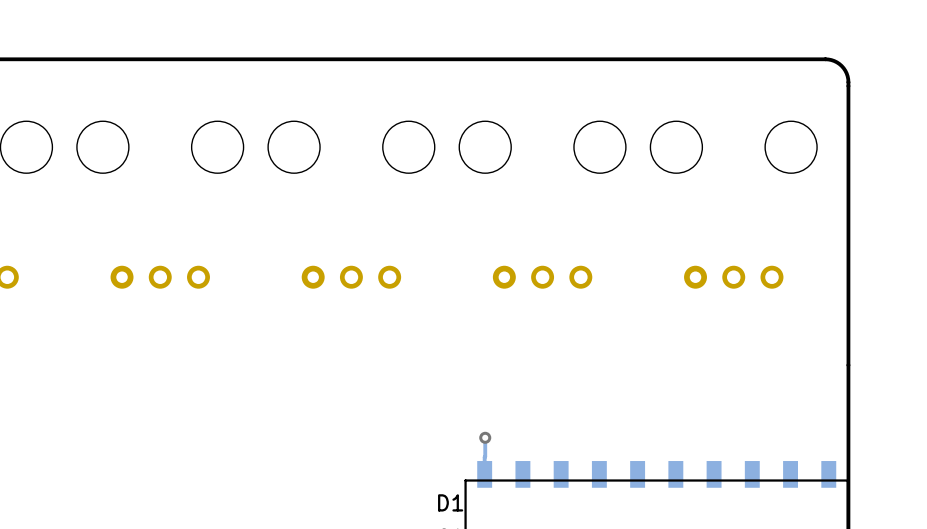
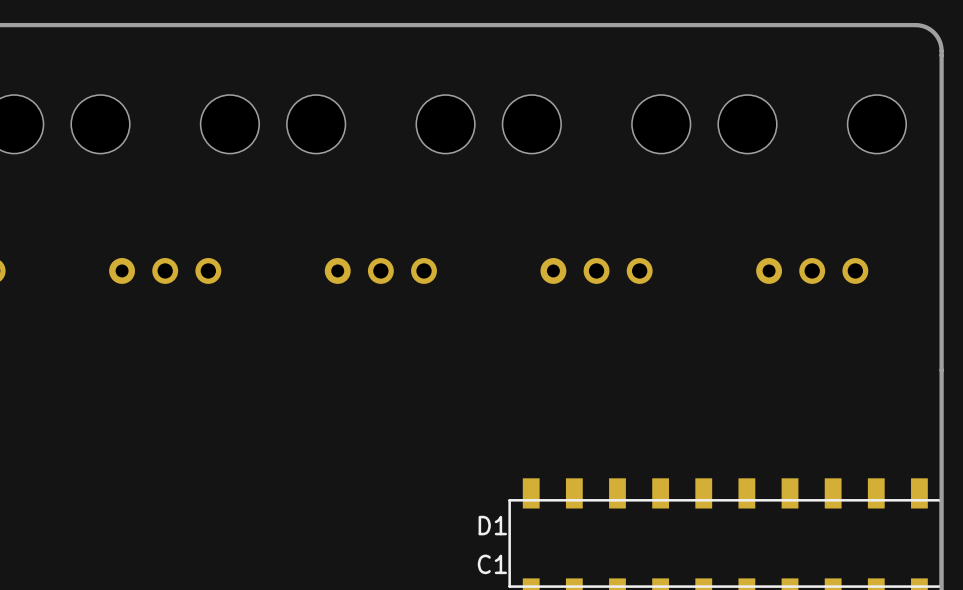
track: (485, 437) (484, 474) -> none
via: (485, 437) -> none

